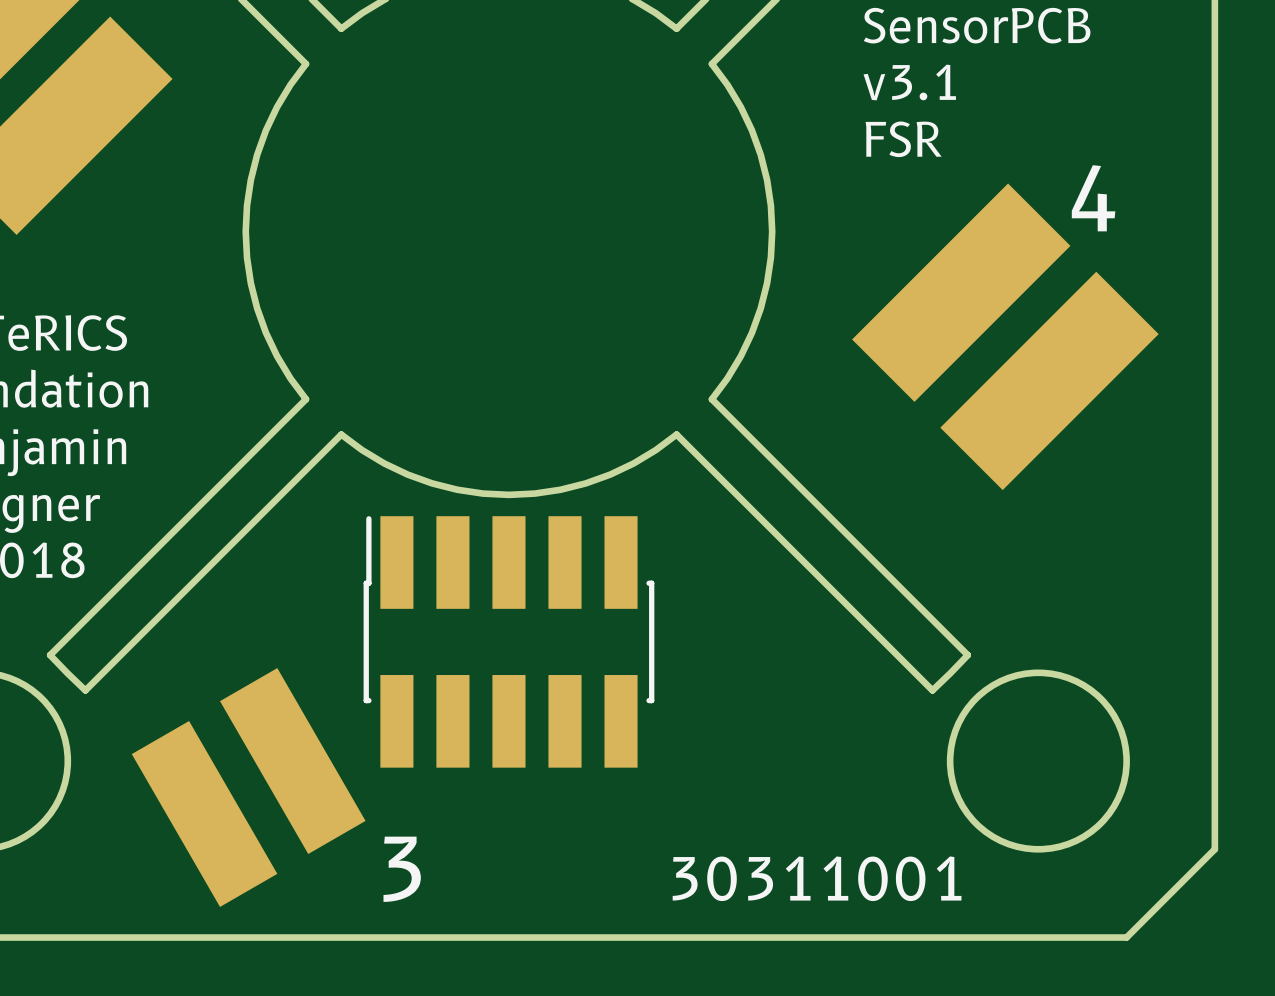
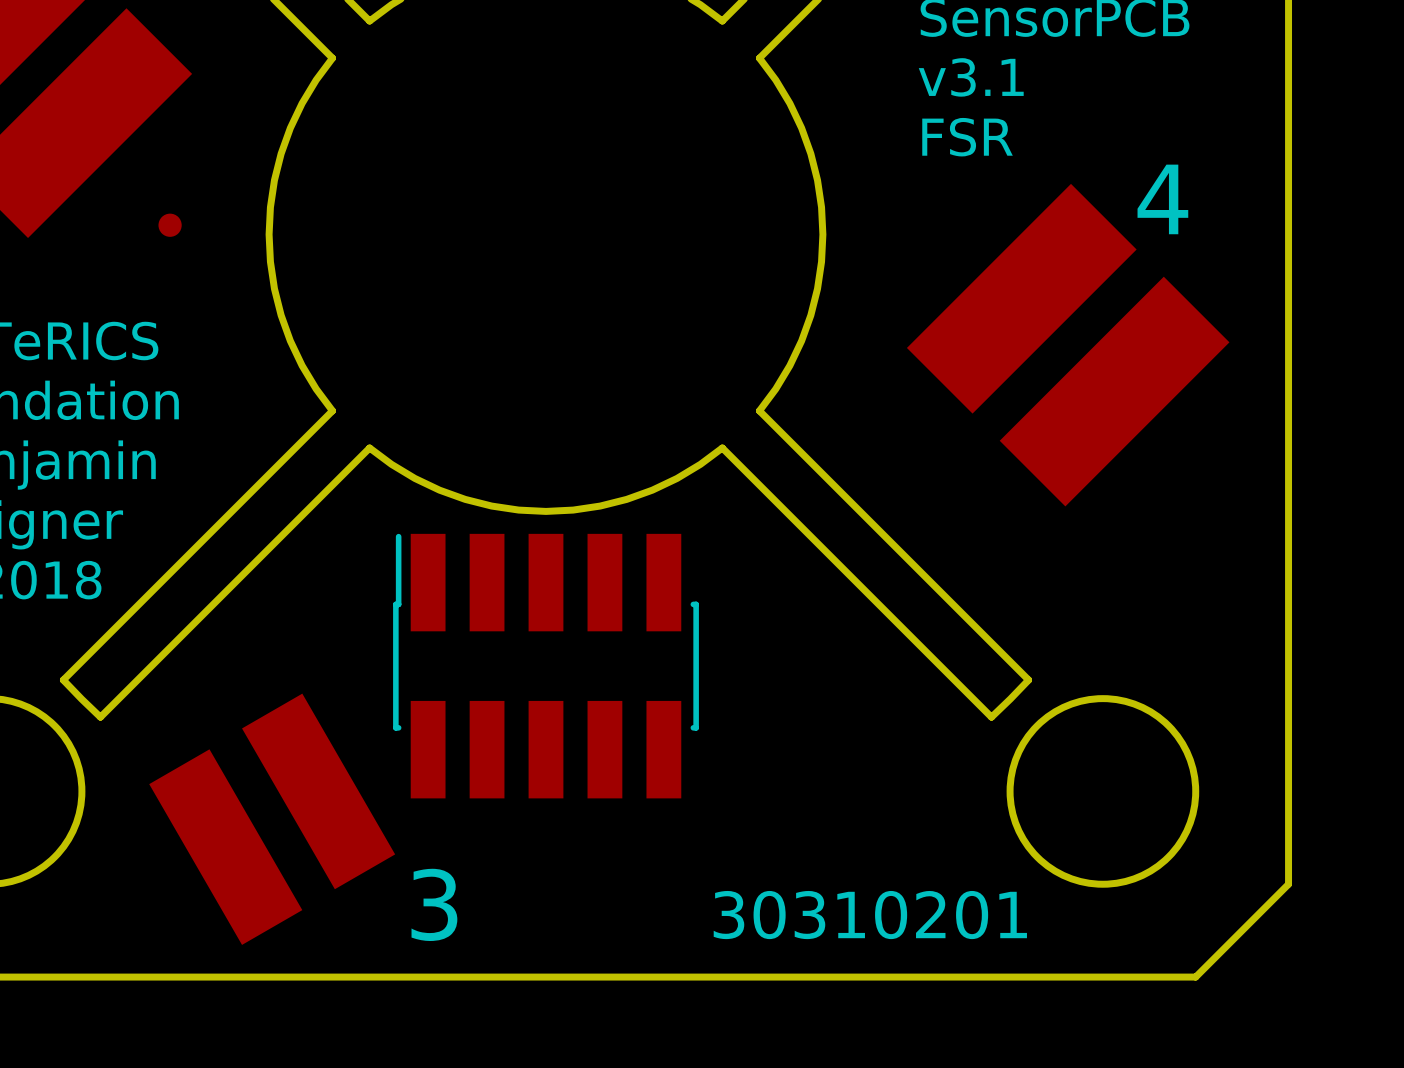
part: none -> (170, 225)
text: 30311001 (817, 878) -> 30310201 (870, 915)

